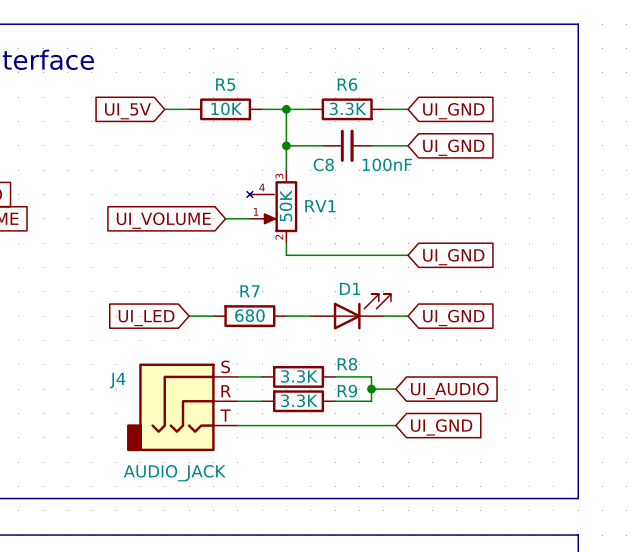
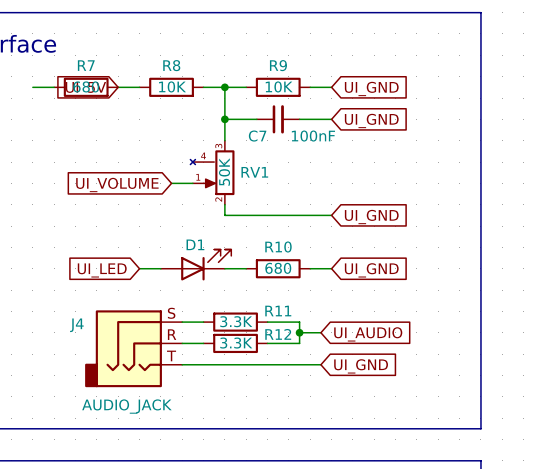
R5 name: R5 (225, 84) -> R8 (171, 65)
R6 name: R6 (347, 84) -> R9 (278, 65)
R6 value: 3.3K (348, 108) -> 10K (279, 86)
wire: none -> (32, 87) (54, 87)
C8 name: C8 (323, 164) -> C7 (257, 136)
D1 position: (350, 311) -> (196, 265)
R7 position: (249, 316) -> (86, 87)
R10: none -> 680 (278, 268)
R8 name: R8 (347, 364) -> R11 (278, 311)
R9 name: R9 (347, 391) -> R12 (278, 334)

